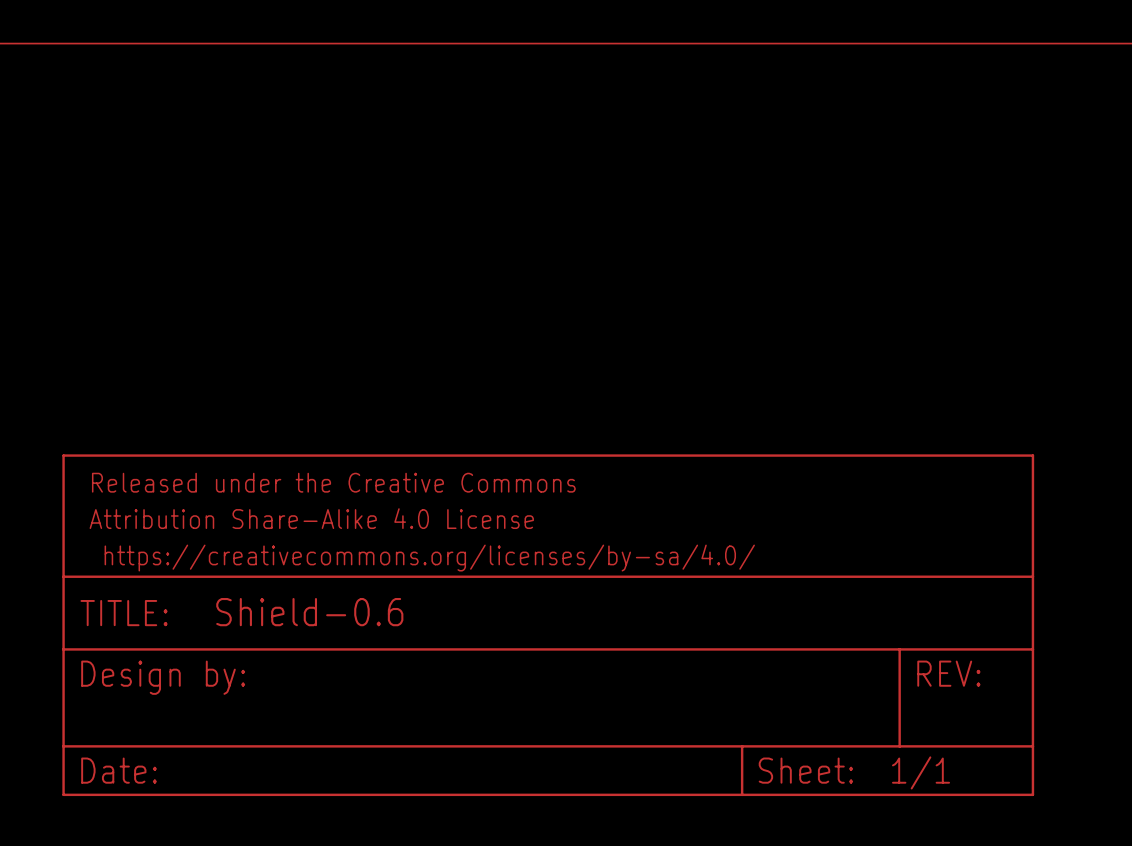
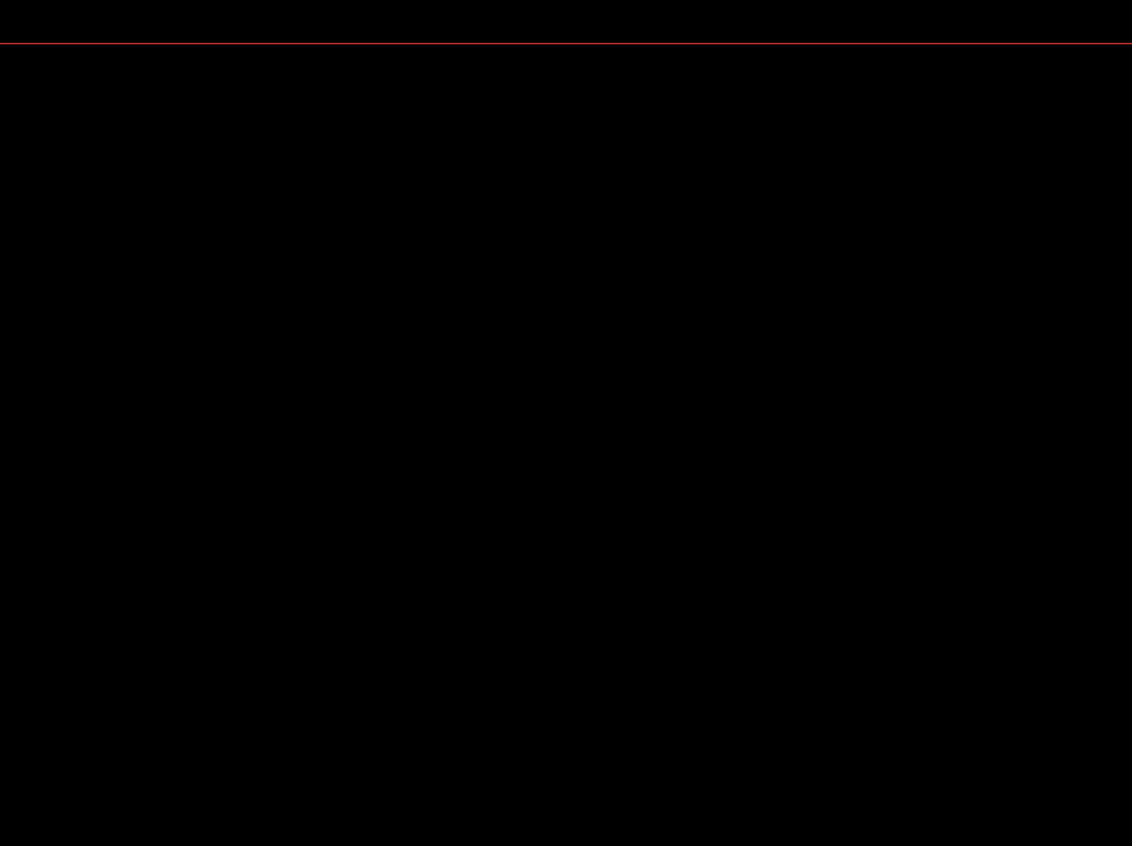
part: (548, 625) -> none

